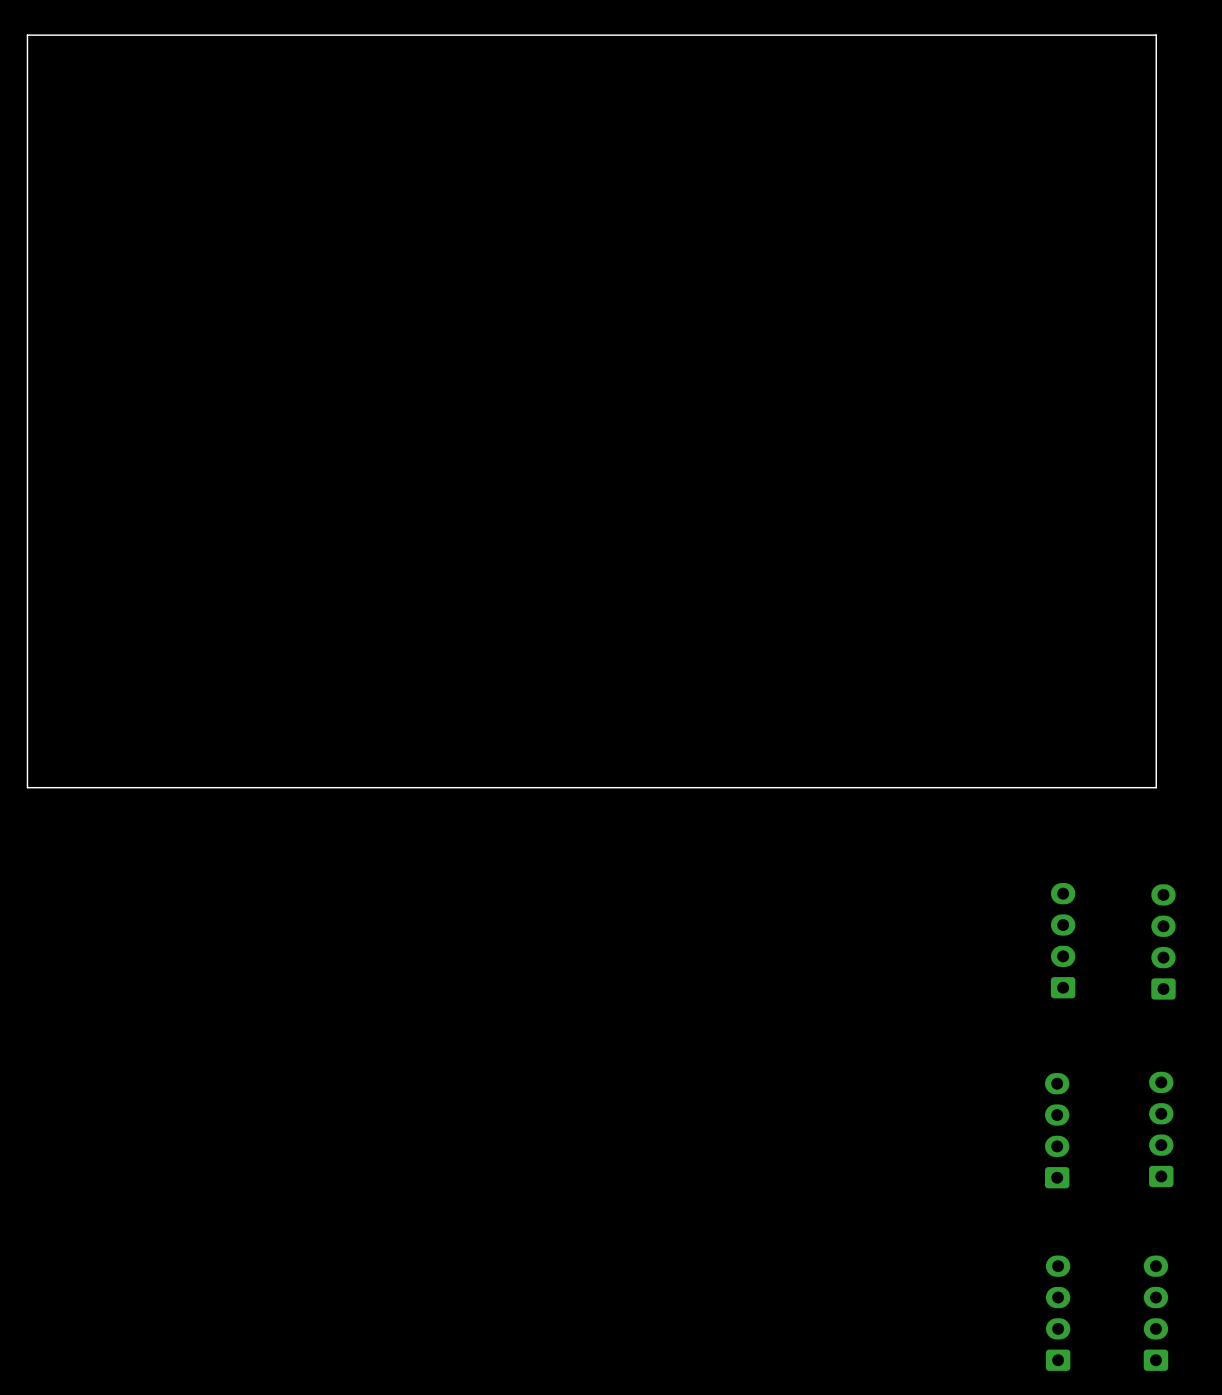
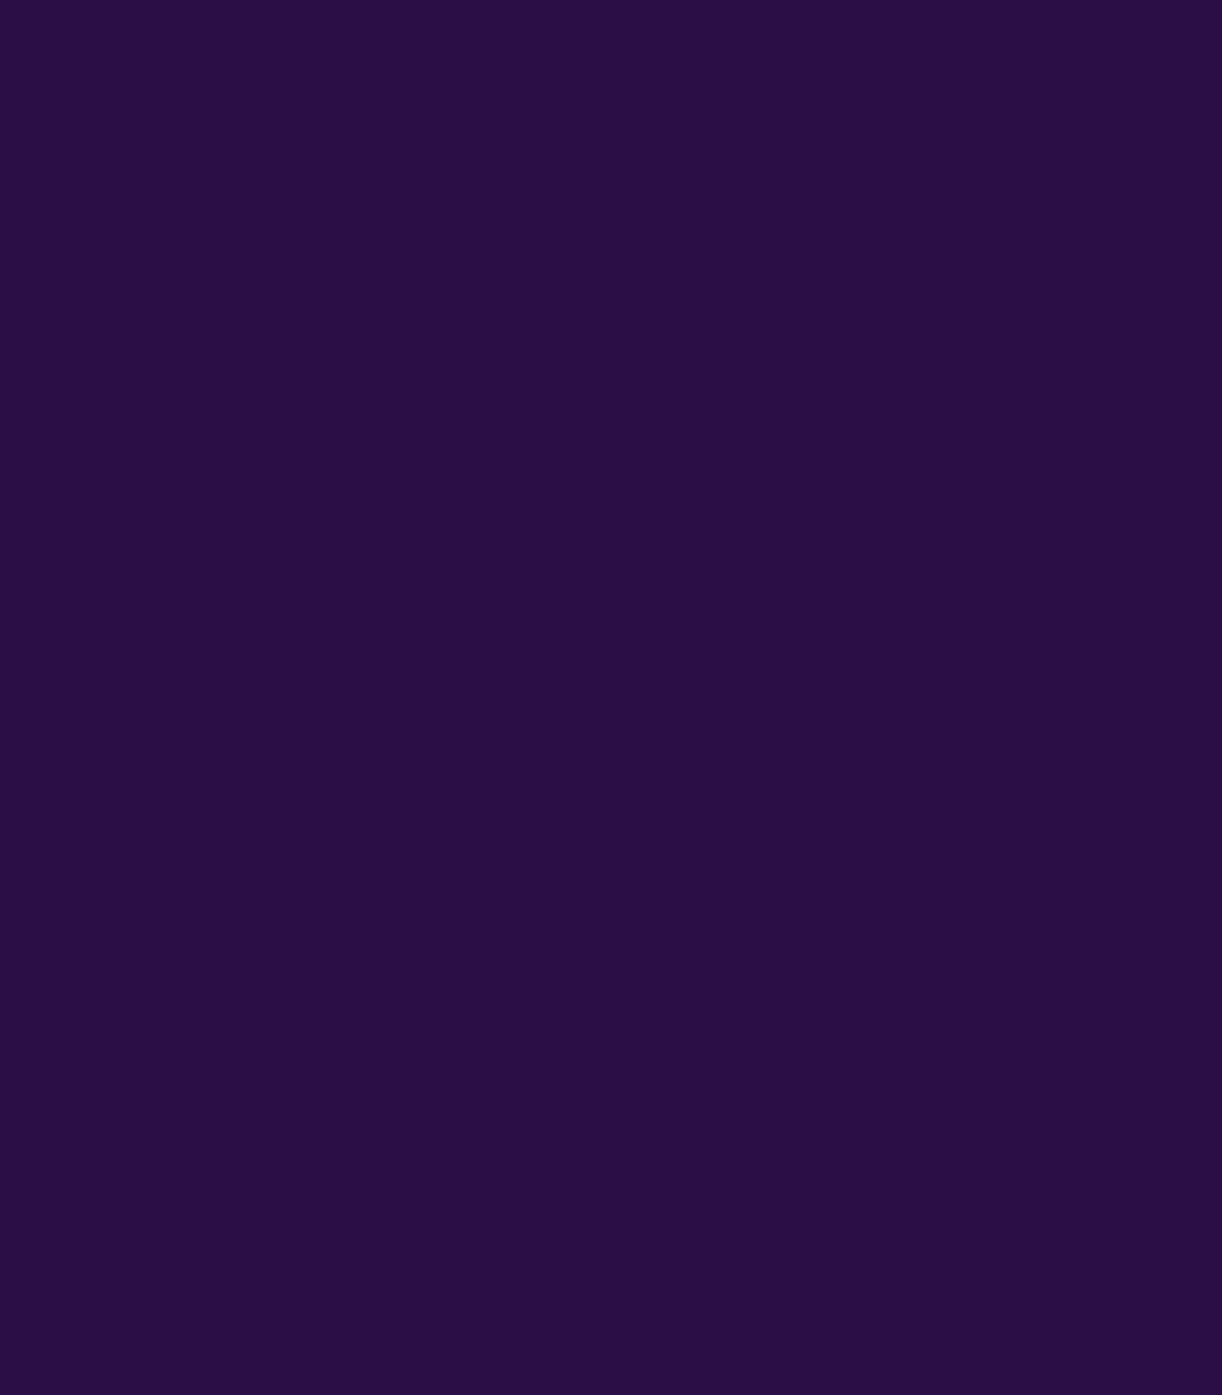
board edge: (1156, 35) (27, 35) (27, 787) (1156, 787) (1156, 35) -> none
part: (1063, 940) -> none
part: (1163, 941) -> none
part: (1161, 1129) -> none
part: (1057, 1130) -> none
part: (1058, 1313) -> none
part: (1155, 1313) -> none

